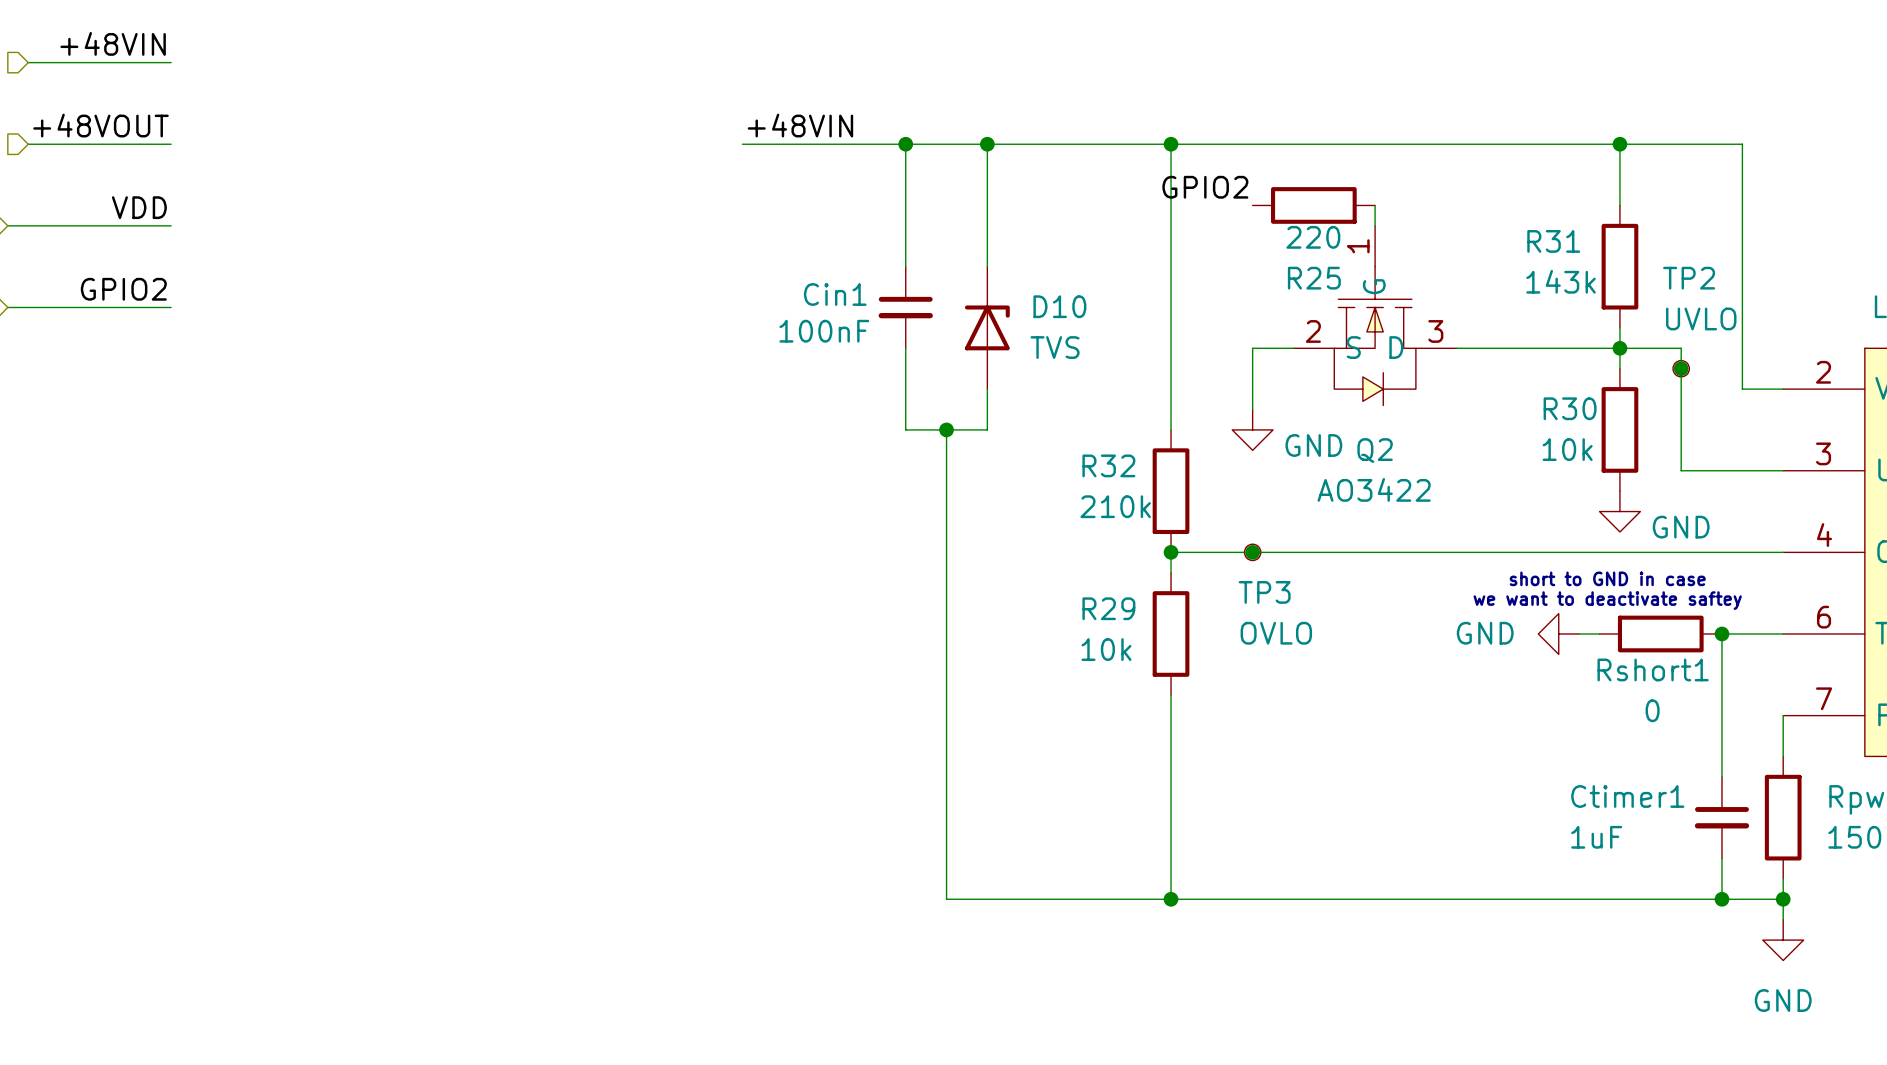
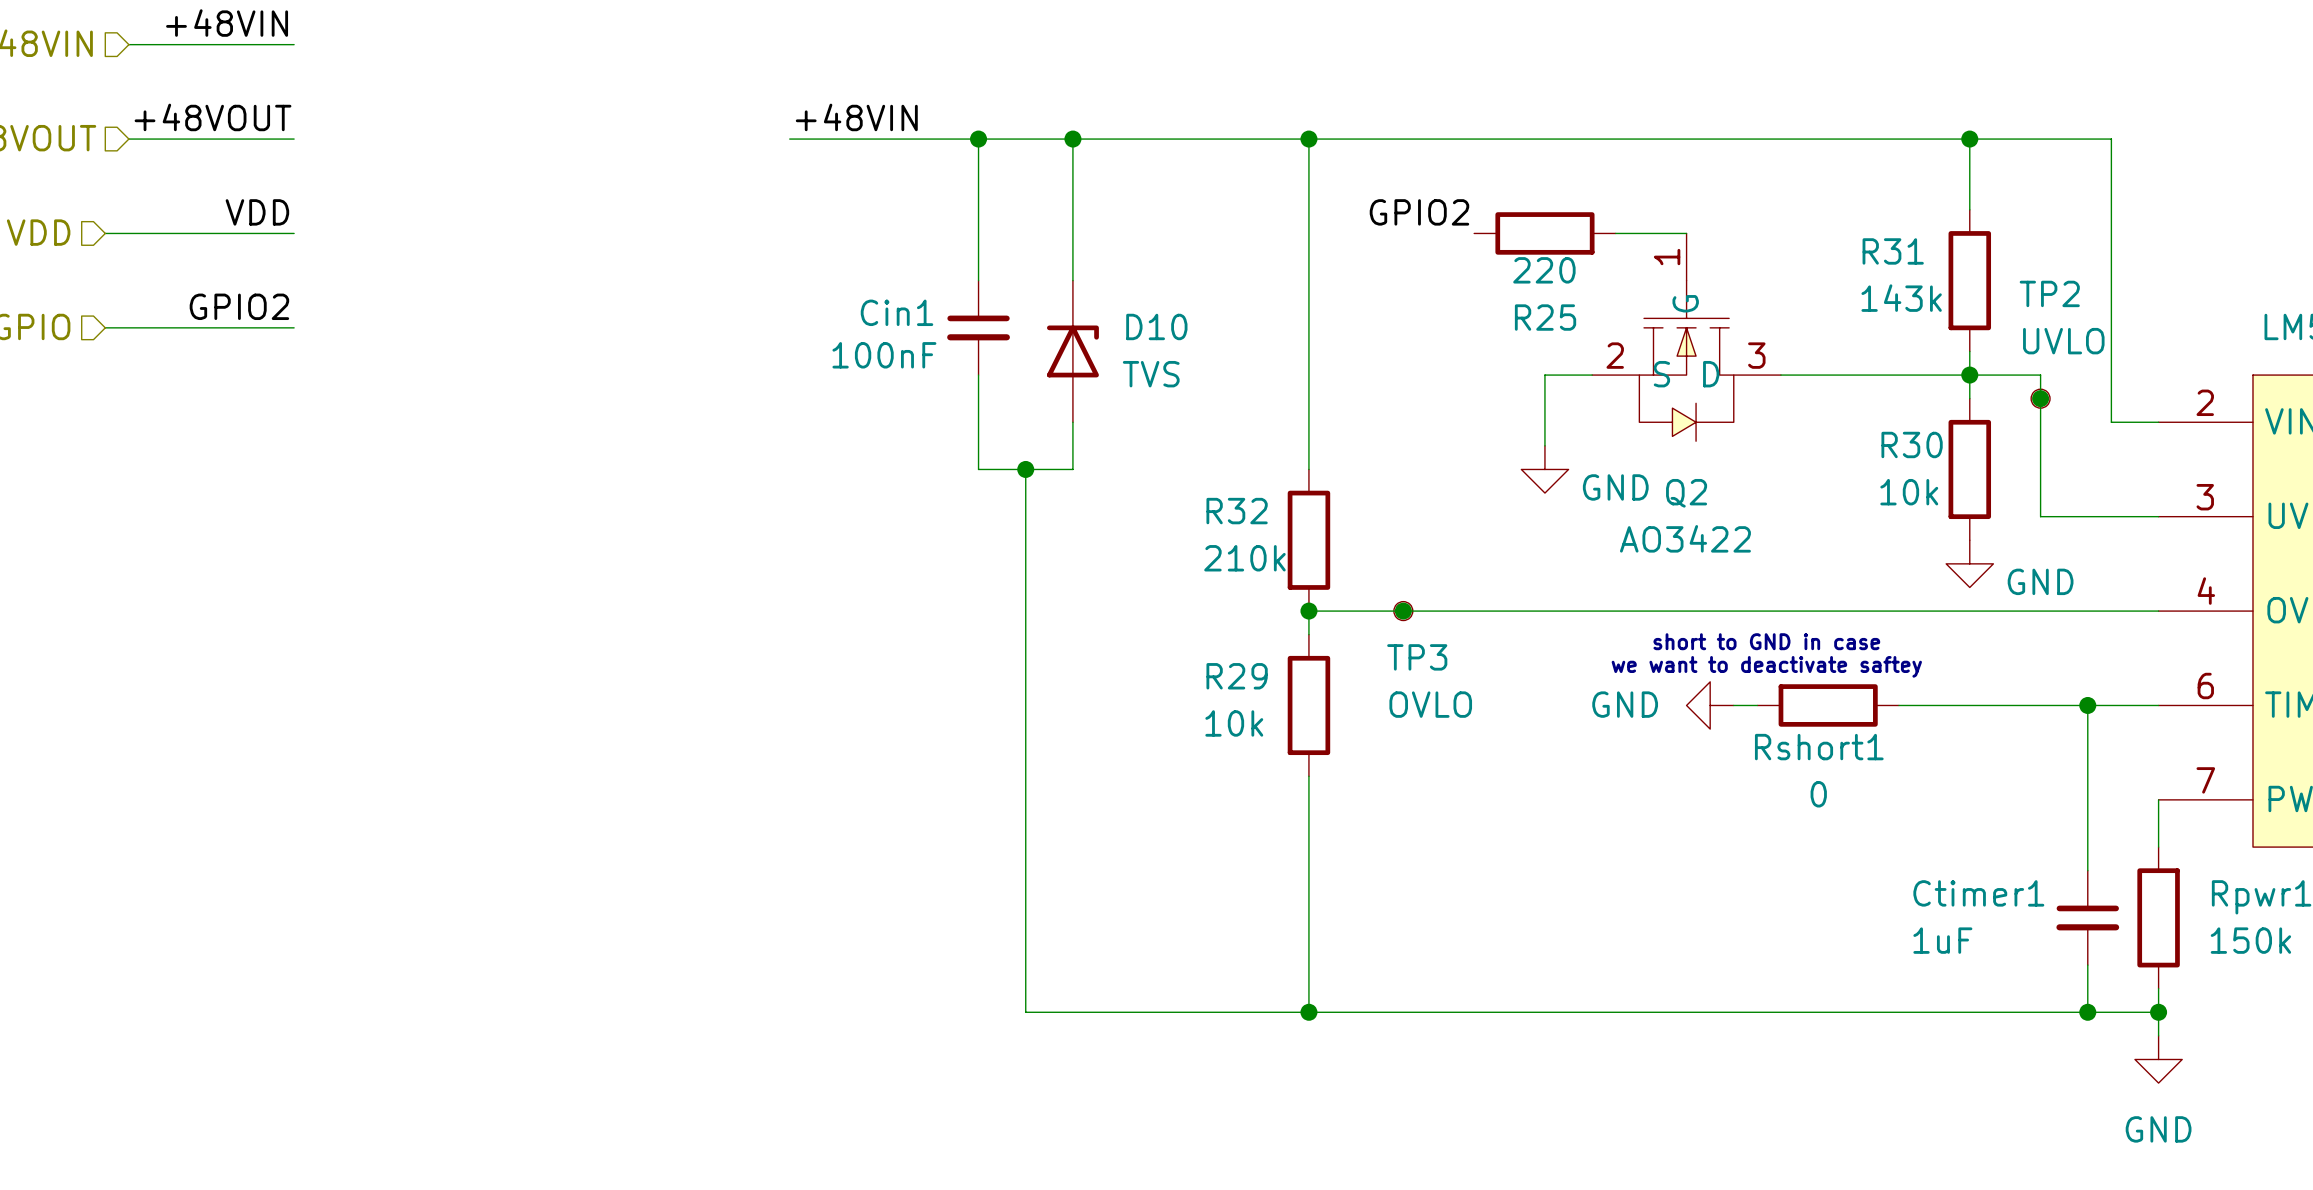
label position: +48VIN (800, 125) -> +48VIN (856, 117)
wire: none -> (789, 139) (954, 139)
junction: none -> (978, 139)
wire: (905, 144) (905, 266) -> (978, 139) (978, 280)
junction position: (905, 144) -> (1072, 139)
wire: (987, 144) (987, 266) -> (1072, 139) (1072, 280)
junction: (987, 144) -> none
junction: none -> (1308, 139)
wire: (1171, 144) (1171, 429) -> (1308, 139) (1308, 469)
junction: (1171, 144) -> none
label position: GPIO2 (1205, 187) -> GPIO2 (1419, 212)
R25 position: (1313, 205) -> (1544, 233)
wire: (1375, 205) (1375, 225) -> (1615, 233) (1686, 233)
Cin1 position: (905, 307) -> (978, 327)
D10 position: (987, 327) -> (1072, 351)
wire: (905, 348) (905, 429) (987, 429) (987, 389) -> (978, 375) (978, 469) (1072, 469) (1072, 422)
junction: none -> (1025, 469)
wire: (946, 429) (946, 899) -> (1025, 469) (1025, 1012) (1190, 1012)
junction: (946, 429) -> none
R32 position: (1171, 491) -> (1308, 540)
junction: none -> (1308, 611)
wire: (1171, 552) (1171, 572) -> (1450, 611) (1308, 611) (1308, 634)
junction position: (1171, 552) -> (1403, 611)
junction: (1252, 552) -> none
TP3 position: (1252, 552) -> (1403, 611)
text position: short to GND in case (1607, 578) -> short to GND in case (1766, 641)
text position: we want to deactivate saftey (1607, 600) -> we want to deactivate saftey (1766, 666)
R29 position: (1171, 633) -> (1308, 705)
wire: none -> (1733, 705) (1757, 705)
power symbol position: GND (1558, 633) -> GND (1710, 705)
wire: none -> (1946, 705) (2087, 705)
Rshort1 position: (1660, 633) -> (1828, 705)
wire: (1171, 695) (1171, 899) -> (1308, 776) (1308, 1012)
junction: none -> (1308, 1012)
junction: (1171, 899) -> none

